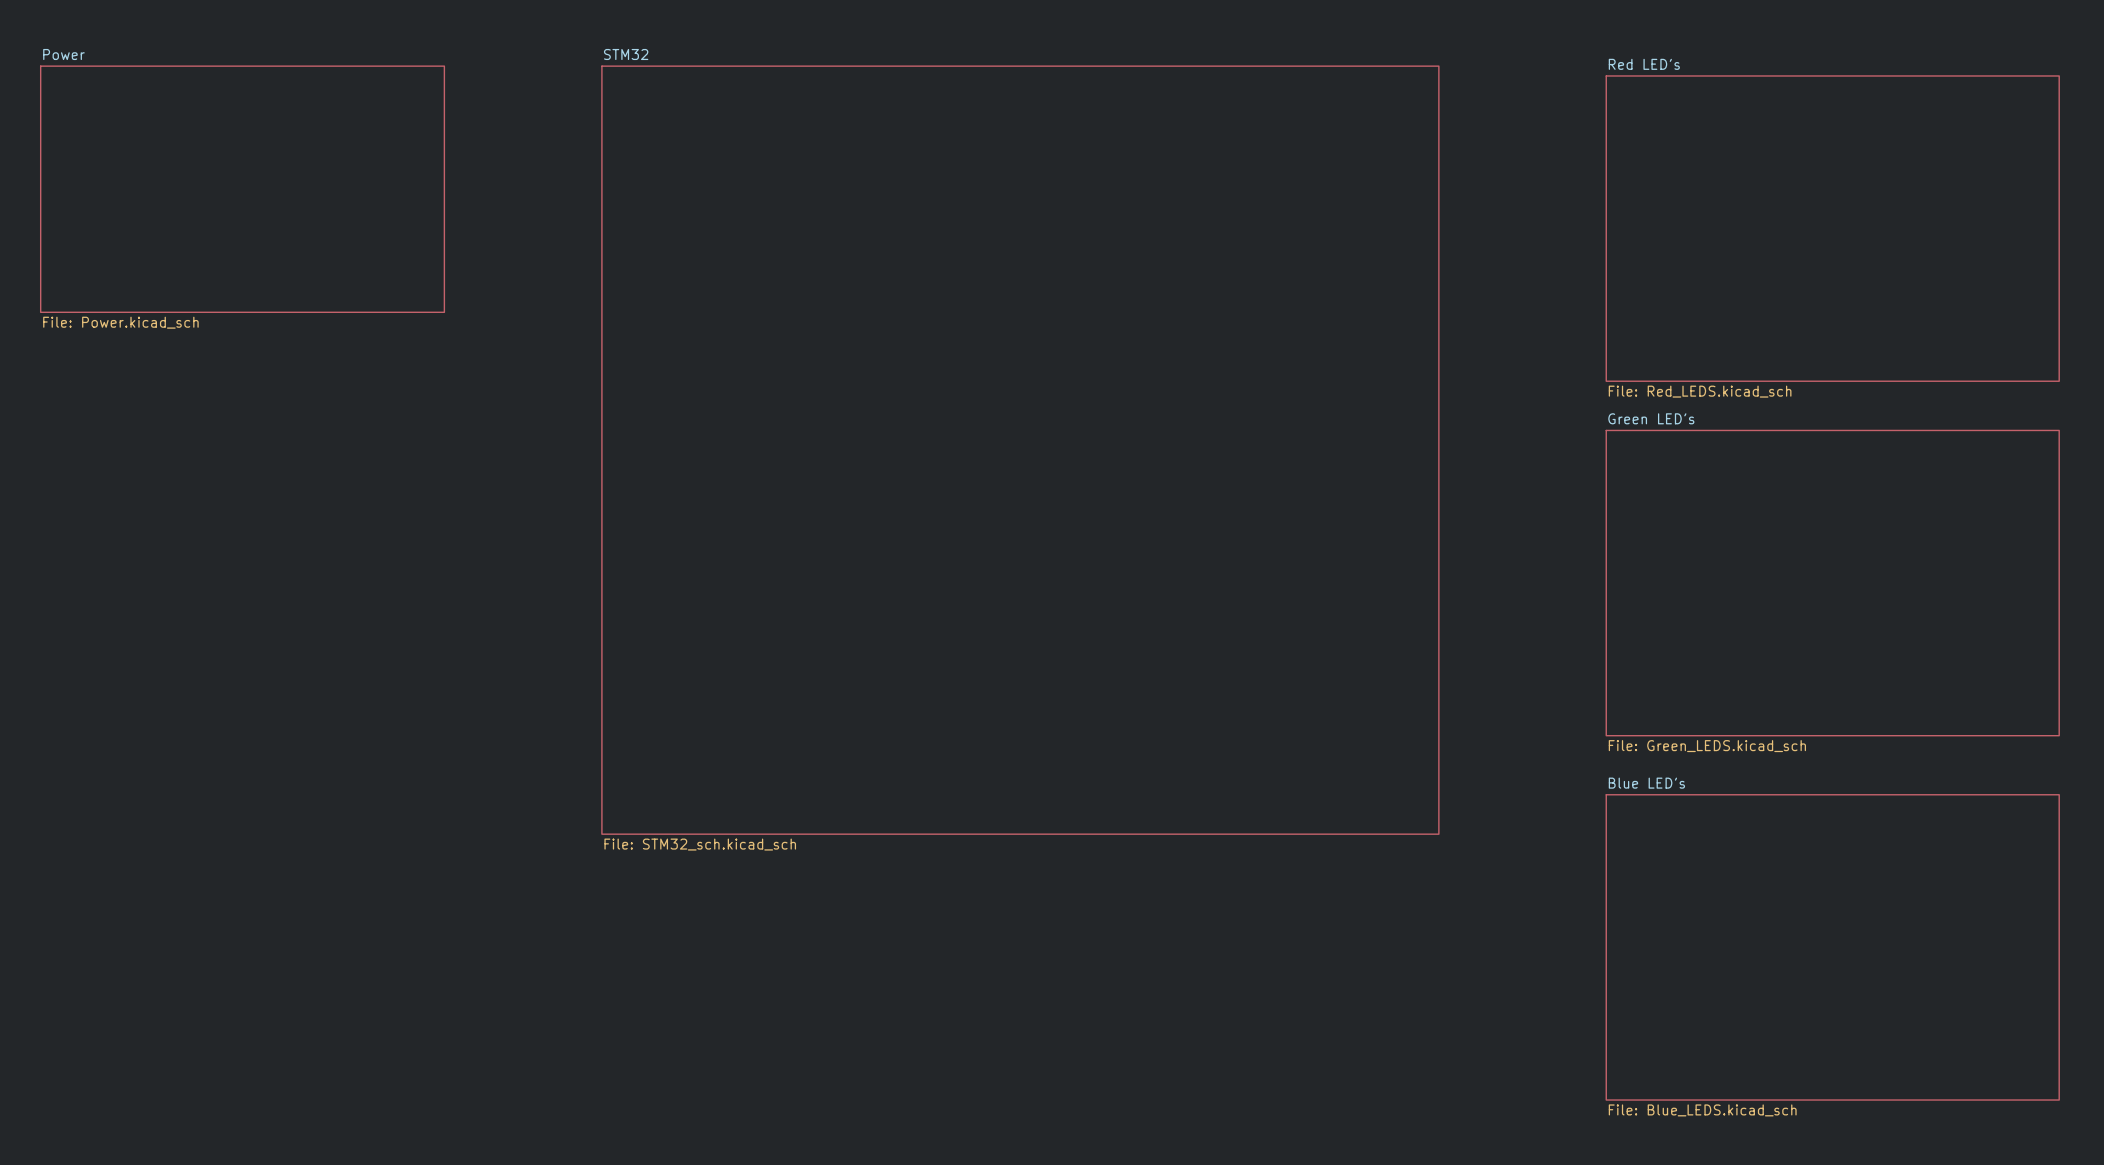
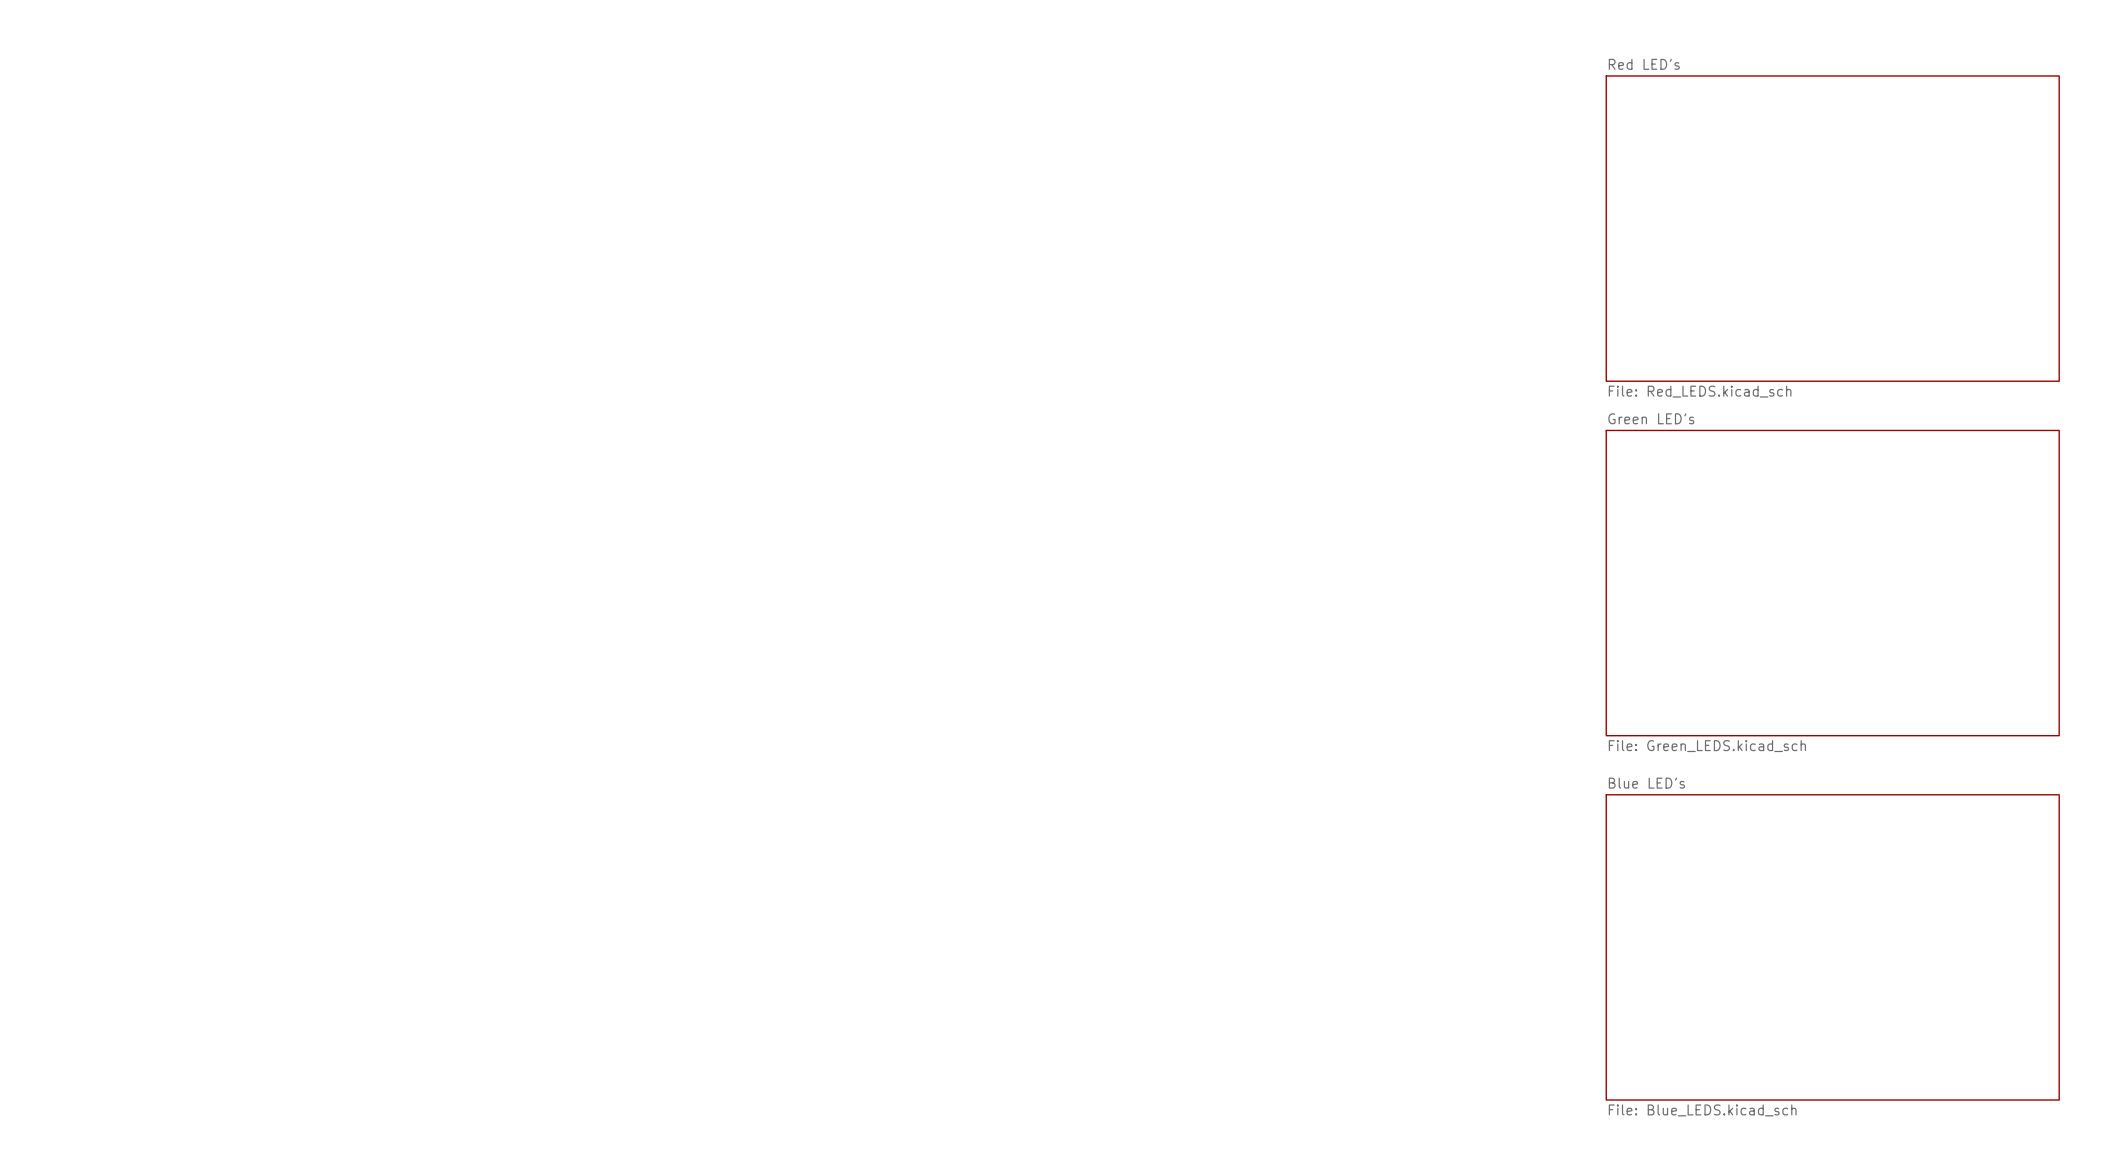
sheet Power: File: Power.kicad_sch (242, 189) -> none
sheet STM32: File: STM32_sch.kicad_sch (1020, 450) -> none

